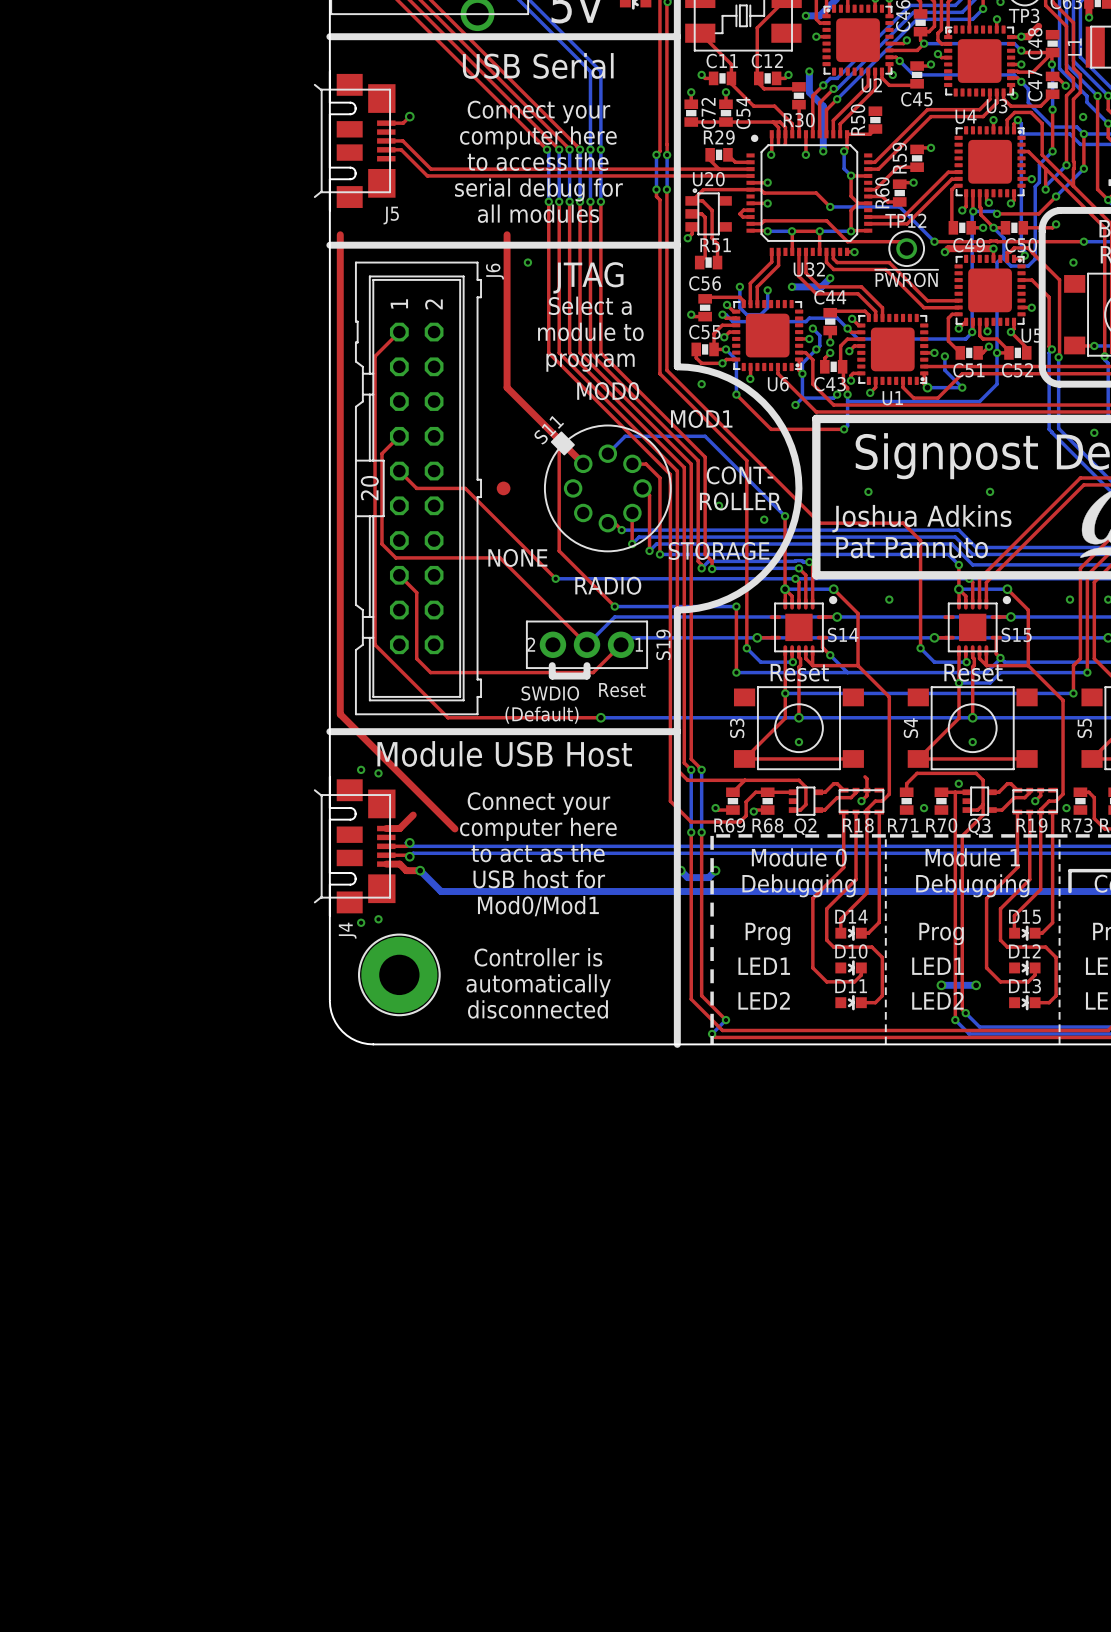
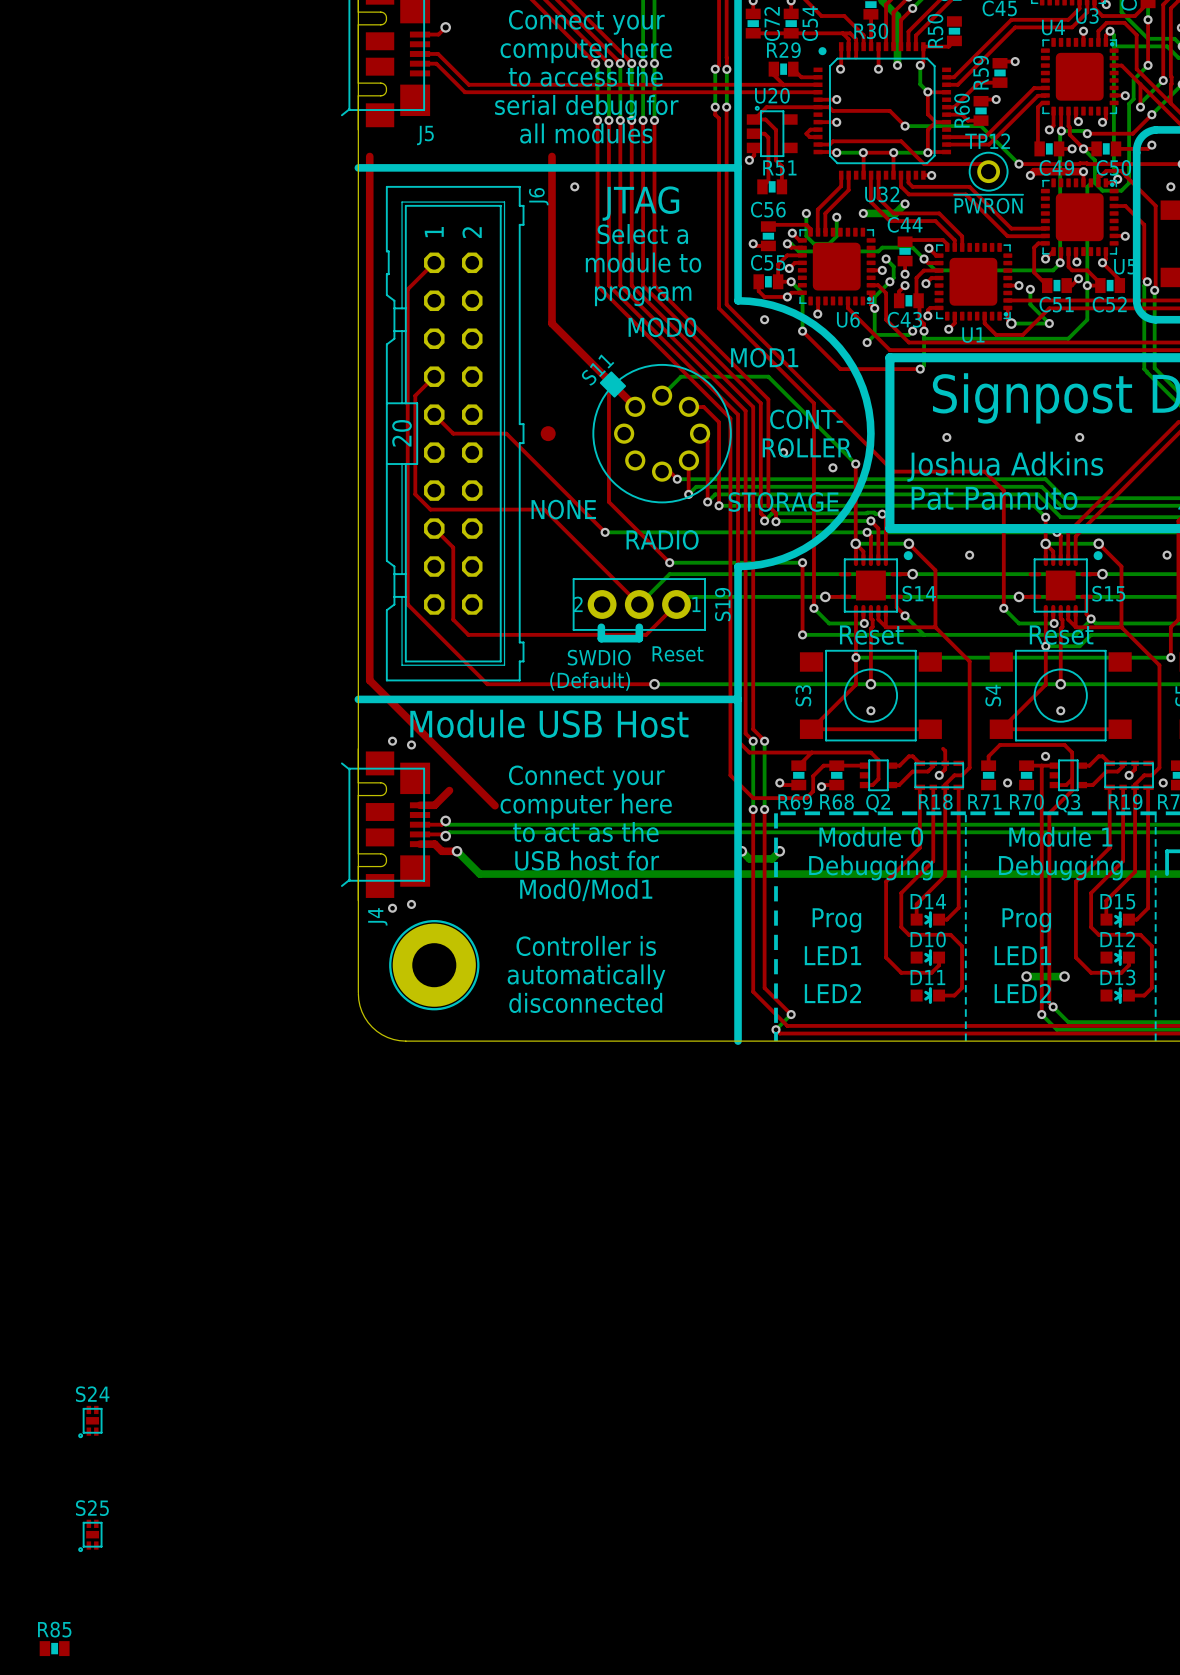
S24: none -> (90, 1422)
S25: none -> (90, 1535)
R85: none -> (54, 1648)

